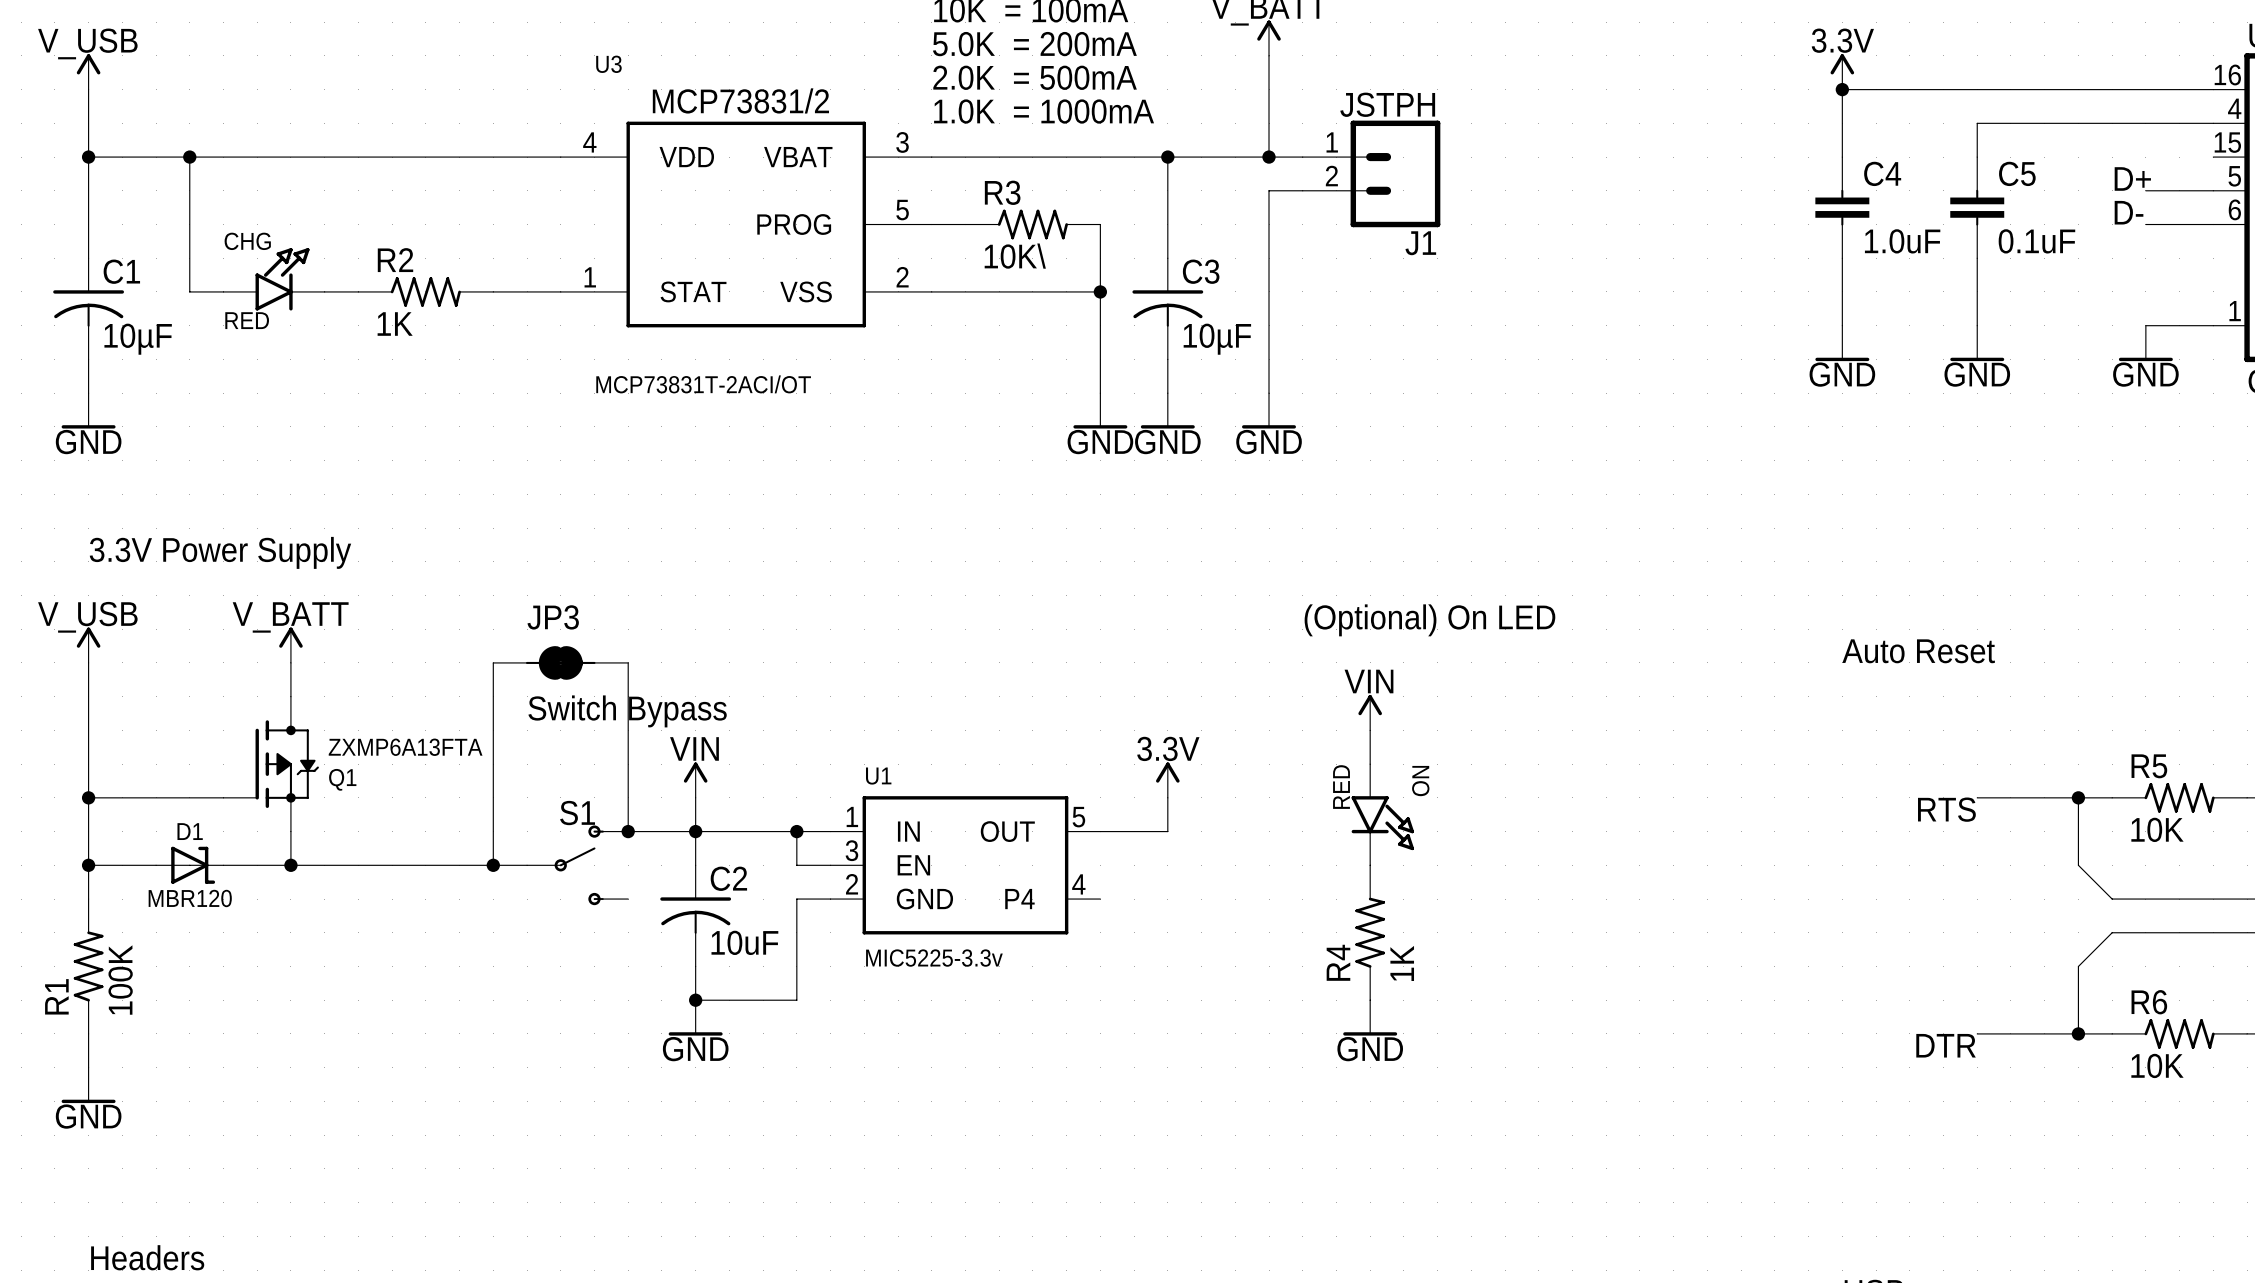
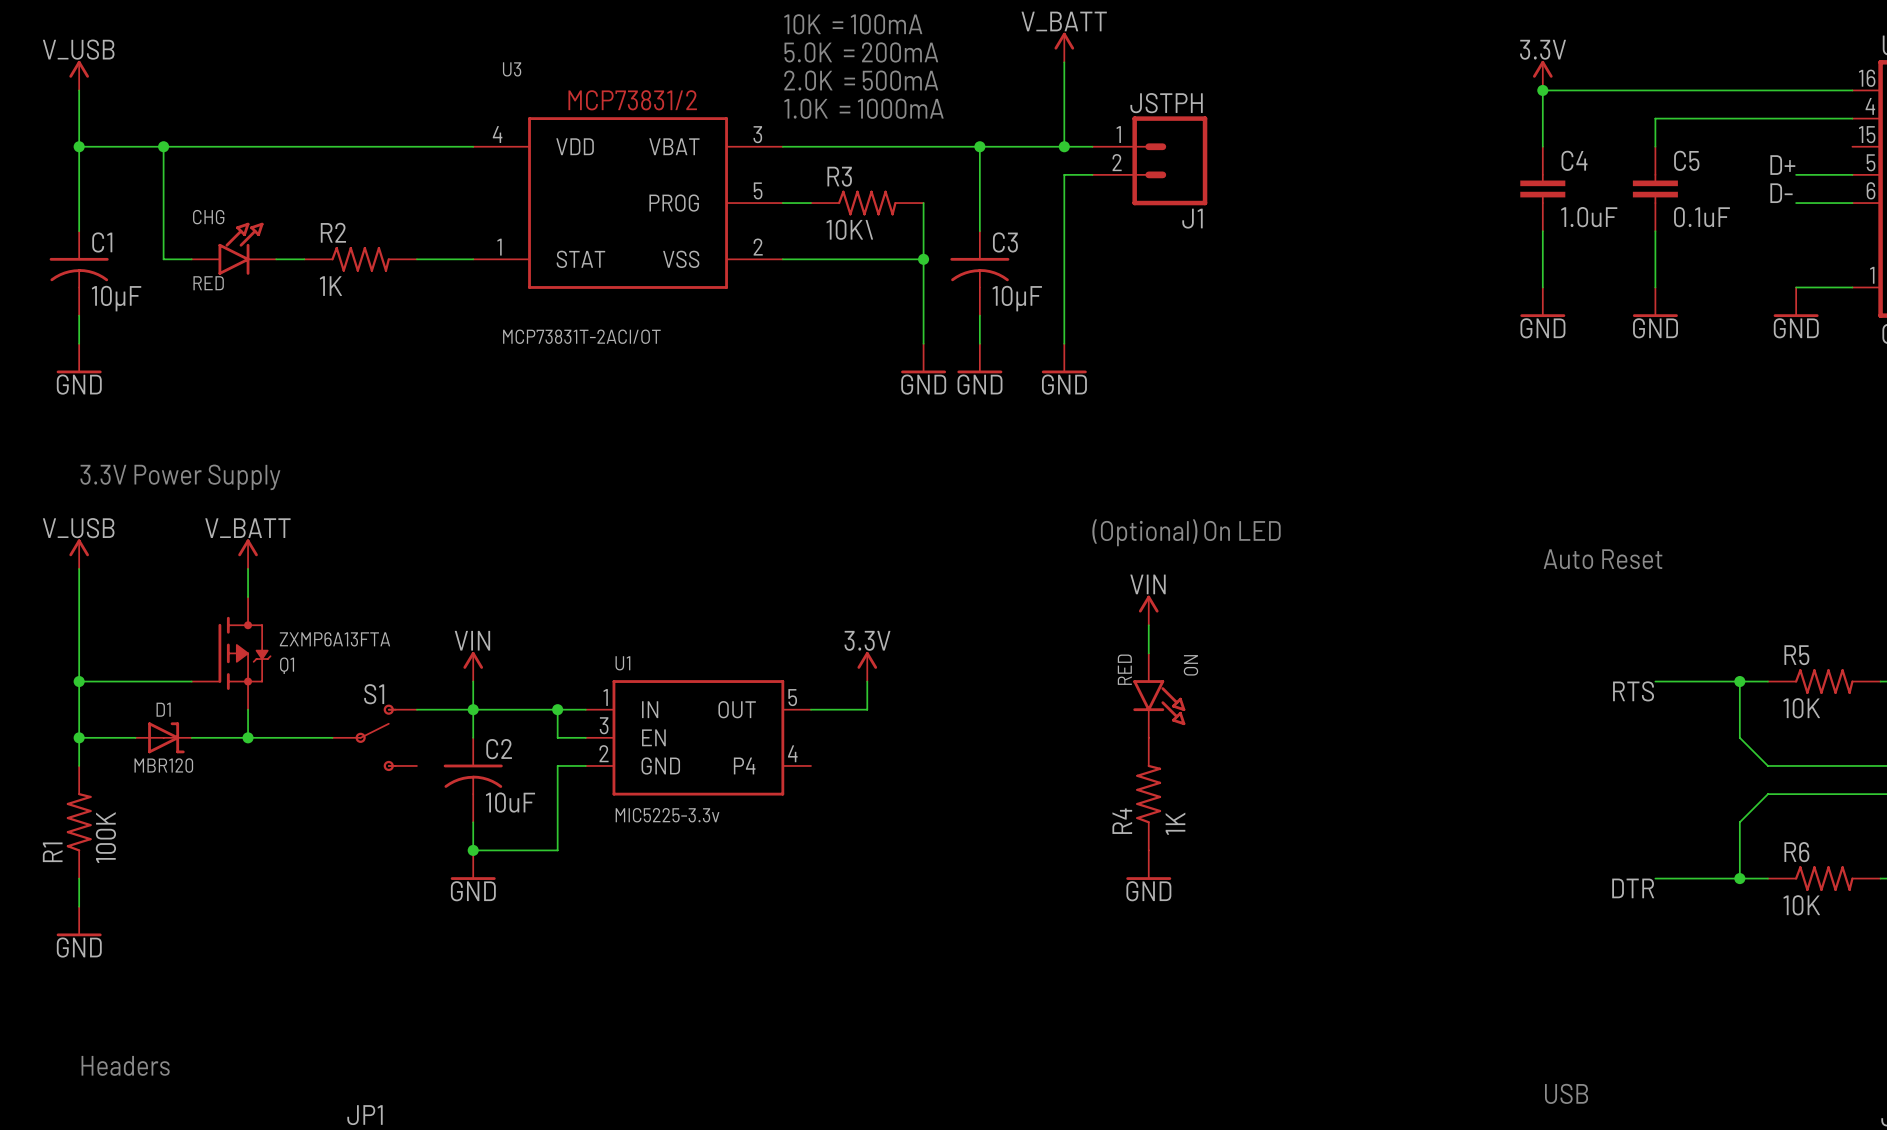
wire: (493, 662) (493, 865) -> none
JP3: Switch Bypass (560, 662) -> none
wire: (628, 662) (628, 831) -> (416, 709) (529, 709)
power symbol position: VIN (695, 780) -> VIN (473, 666)
power symbol position: 3.3V (1167, 780) -> 3.3V (867, 666)
wire: none -> (473, 681) (473, 737)
wire: (695, 797) (695, 865) -> (557, 709) (557, 737) (585, 737)
wire: (1167, 797) (1167, 831) (1100, 831) -> (867, 681) (867, 709) (810, 709)
junction: none -> (473, 709)
junction: (628, 831) -> none
junction: none -> (557, 709)
wire: (695, 831) (830, 831) -> none
junction: (695, 831) -> none
wire: (796, 831) (796, 865) (830, 865) -> none
junction: (796, 831) -> none
wire: (392, 865) (527, 865) -> none
junction: (493, 865) -> none
S1 position: (577, 865) -> (374, 737)
U1 position: (965, 865) -> (698, 737)
wire: (830, 899) (796, 899) (796, 1000) (695, 1000) (695, 966) -> (585, 765) (557, 765) (557, 850) (473, 850) (473, 822)
C2 position: (695, 915) -> (473, 780)
junction: none -> (473, 850)
junction: (695, 1000) -> none
power symbol position: GND (695, 1017) -> GND (473, 865)

